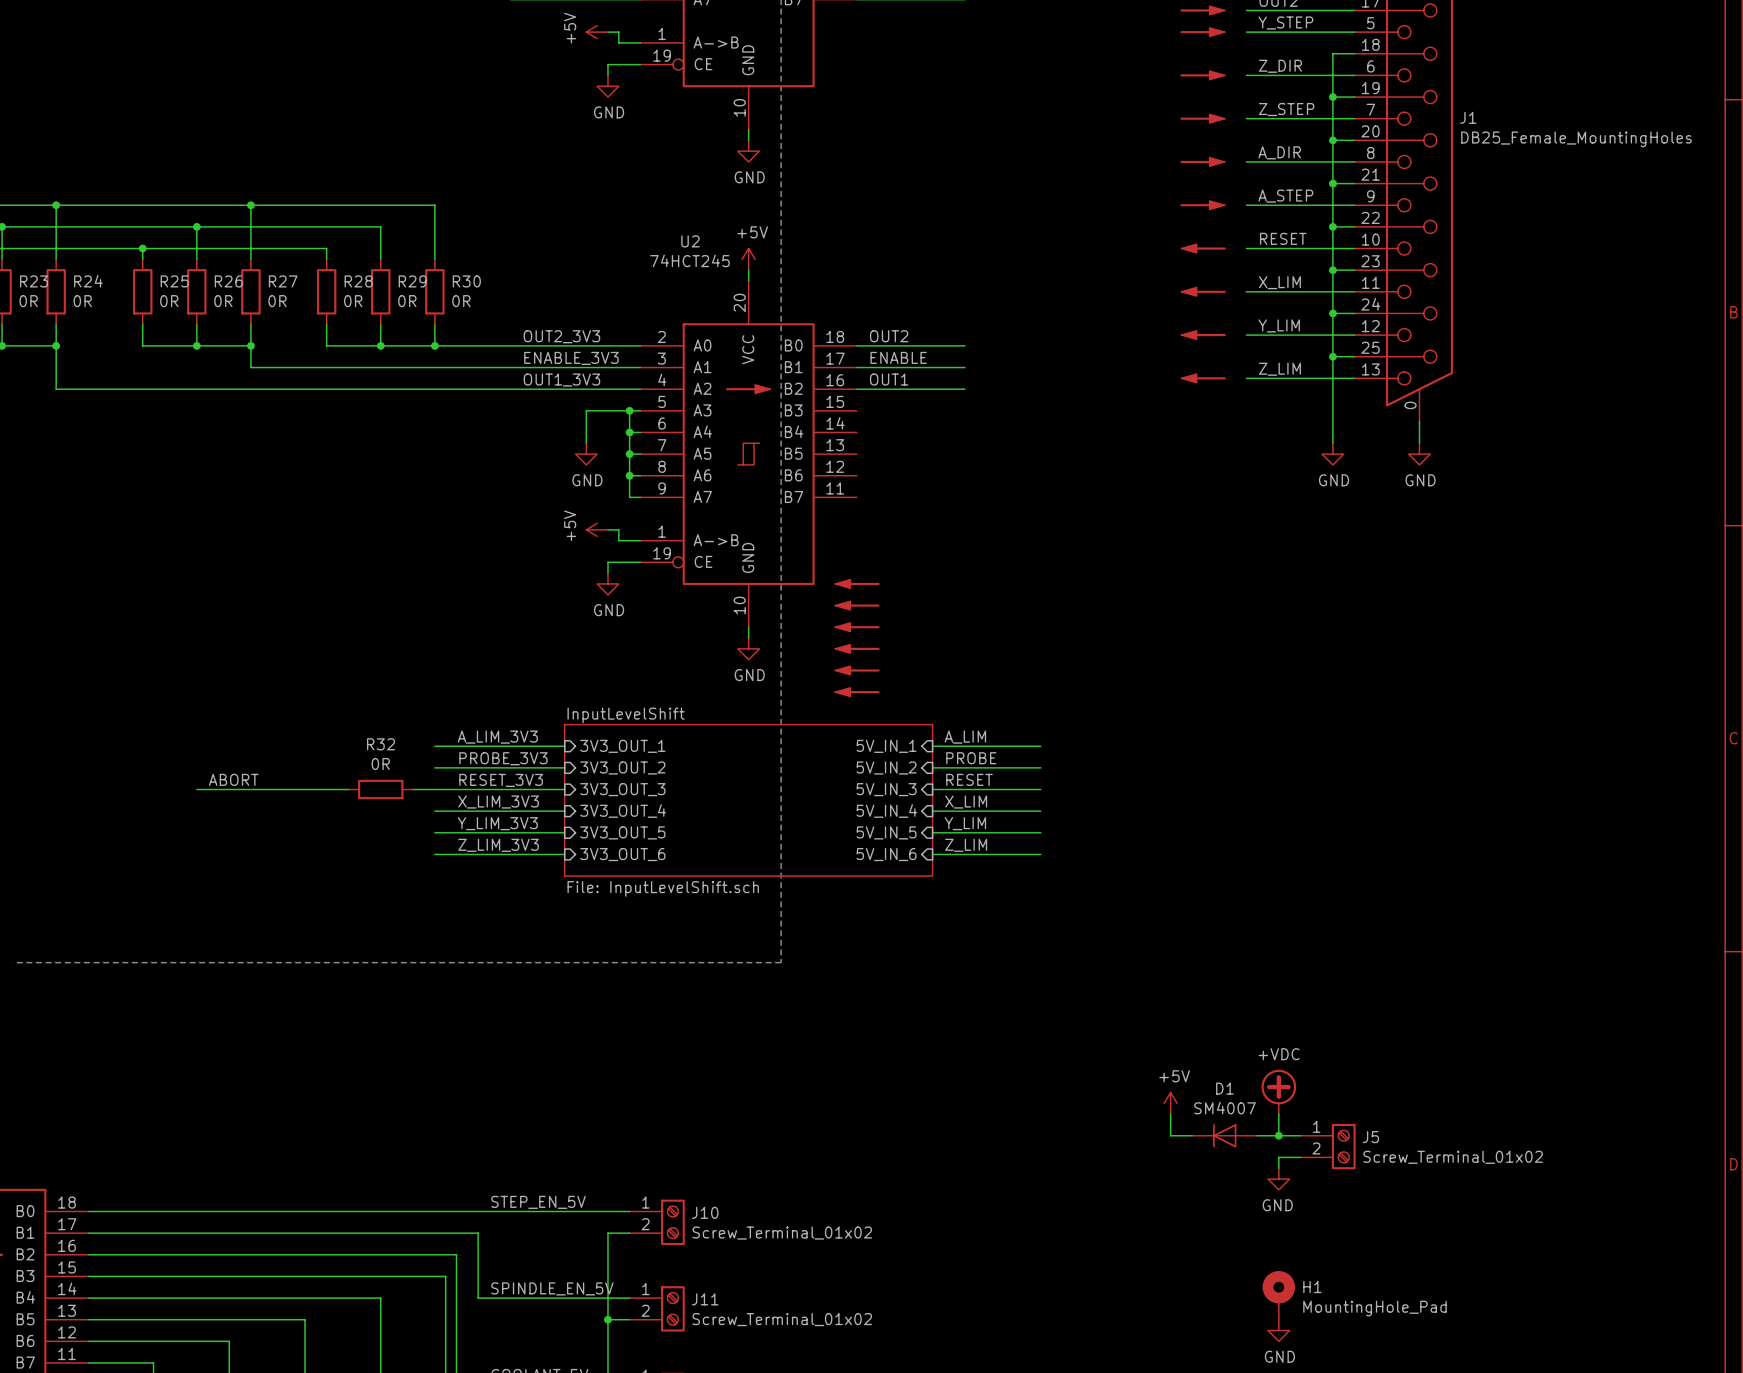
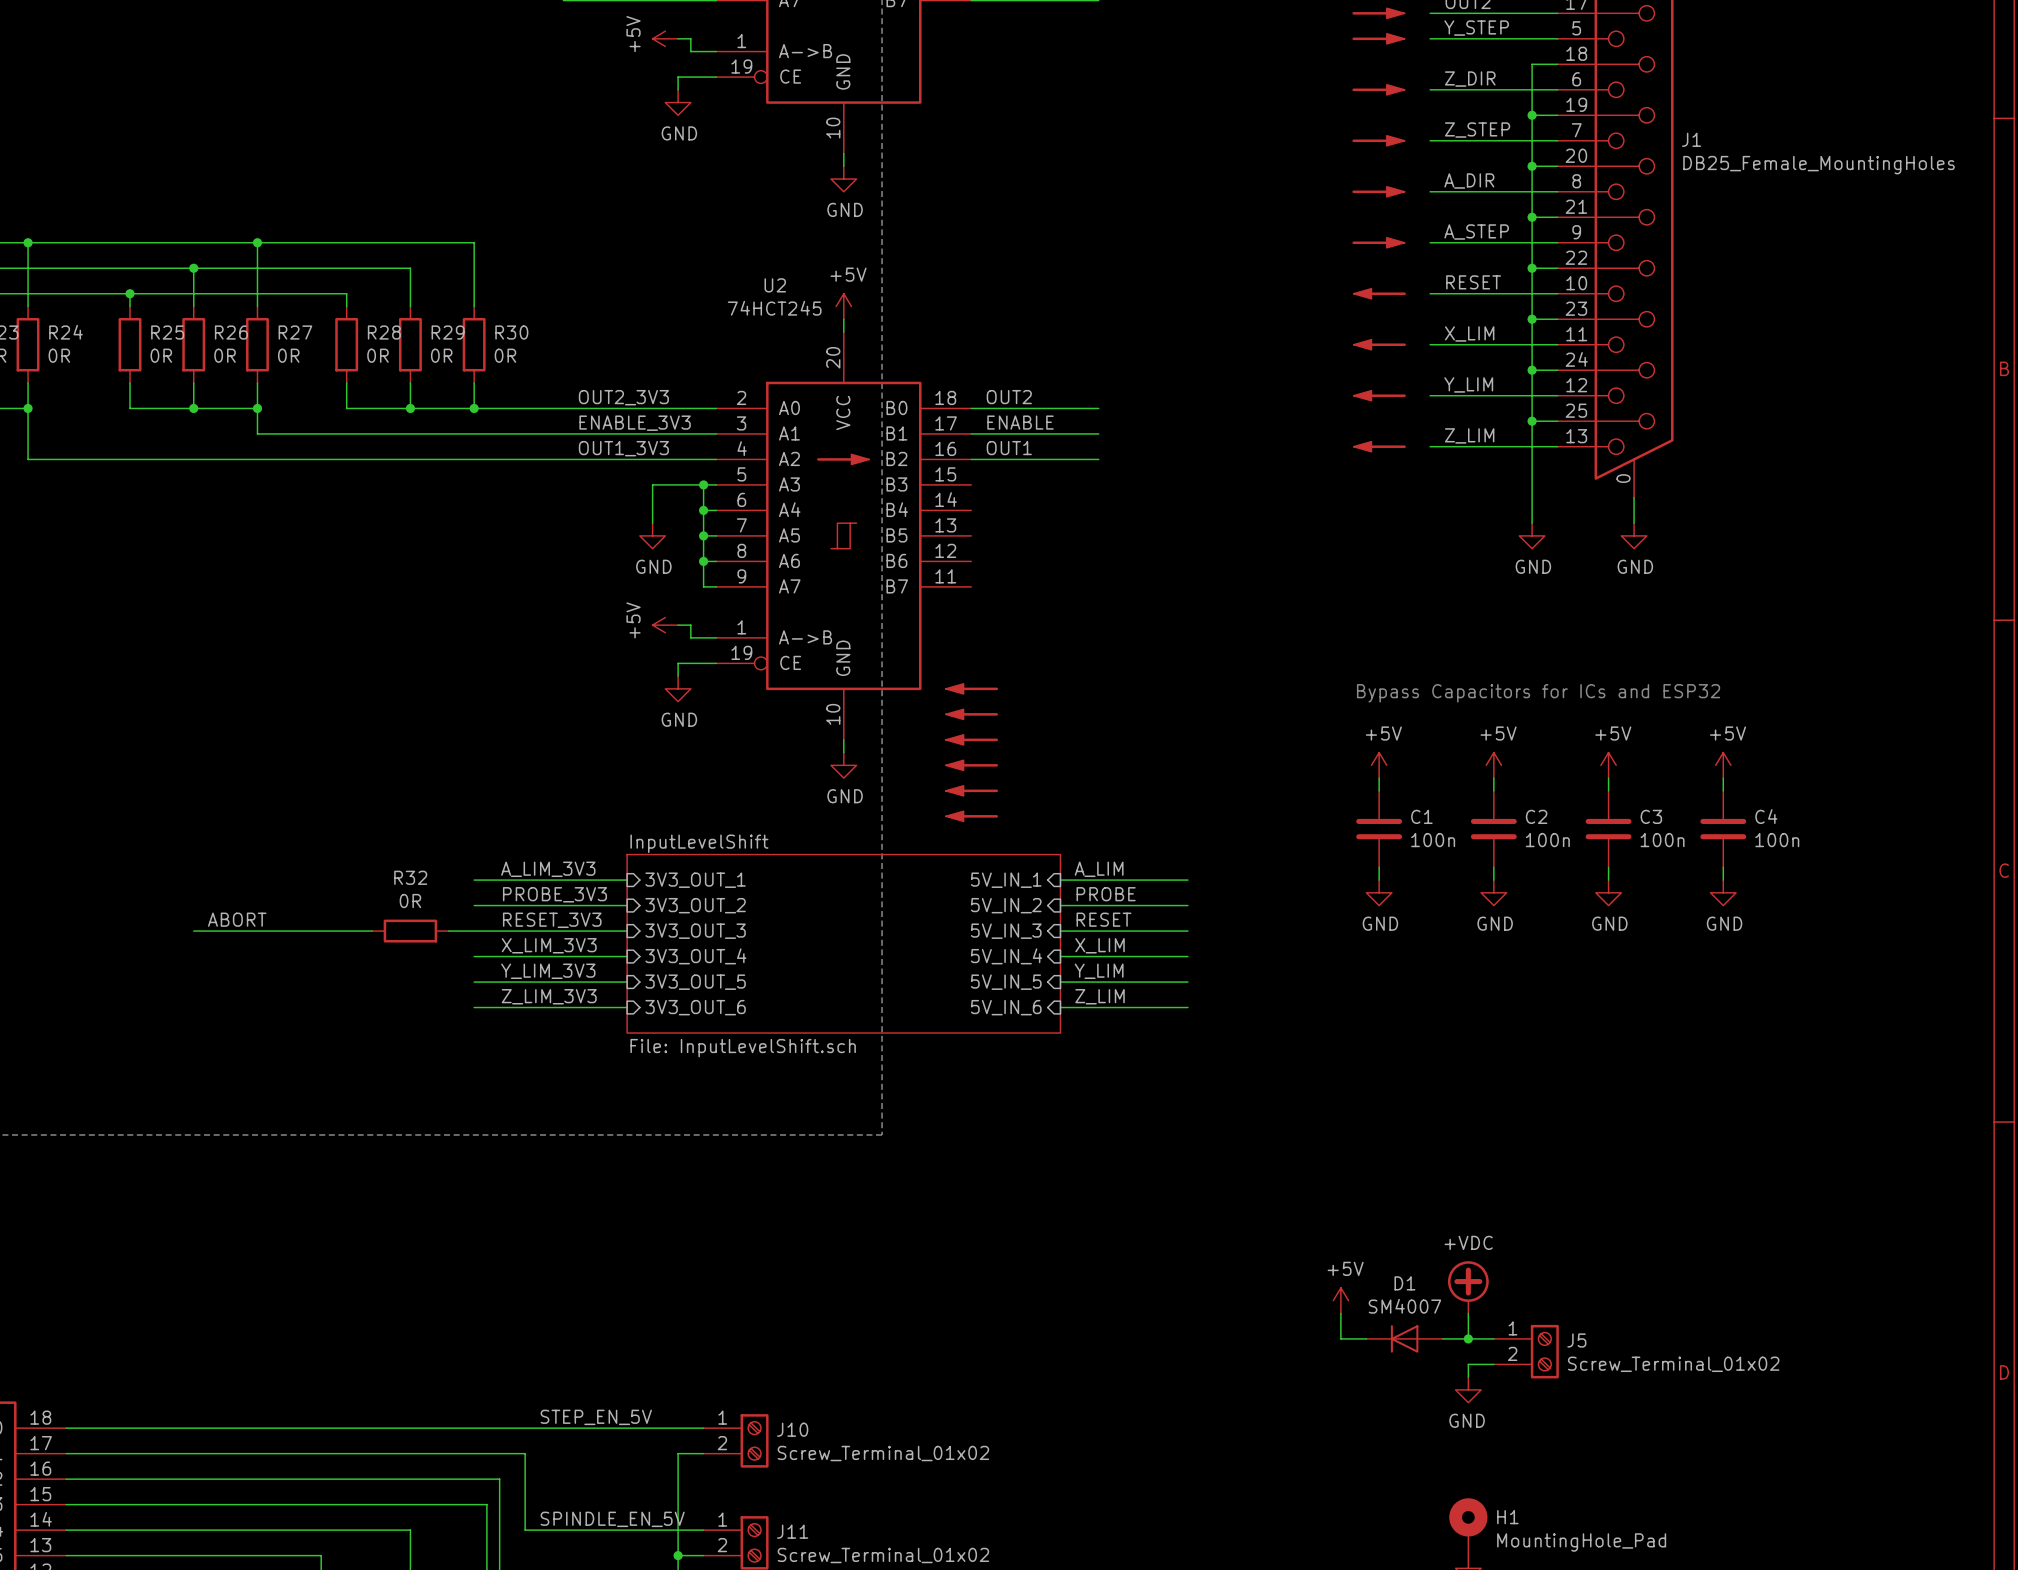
text: none -> Bypass Capacitors for ICs and ESP32 (1538, 693)
power symbol: none -> +5V (1379, 765)
power symbol: none -> +5V (1493, 765)
power symbol: none -> +5V (1608, 765)
power symbol: none -> +5V (1723, 765)
wire: none -> (1379, 778) (1379, 790)
wire: none -> (1493, 778) (1493, 790)
wire: none -> (1608, 778) (1608, 790)
wire: none -> (1723, 778) (1723, 790)
C1: none -> 100n (1379, 829)
C2: none -> 100n (1493, 829)
C3: none -> 100n (1608, 829)
C4: none -> 100n (1723, 829)
wire: none -> (1379, 867) (1379, 880)
wire: none -> (1493, 867) (1493, 880)
wire: none -> (1608, 867) (1608, 880)
wire: none -> (1723, 867) (1723, 880)
power symbol: none -> GND (1379, 892)
power symbol: none -> GND (1493, 892)
power symbol: none -> GND (1608, 892)
power symbol: none -> GND (1723, 892)

